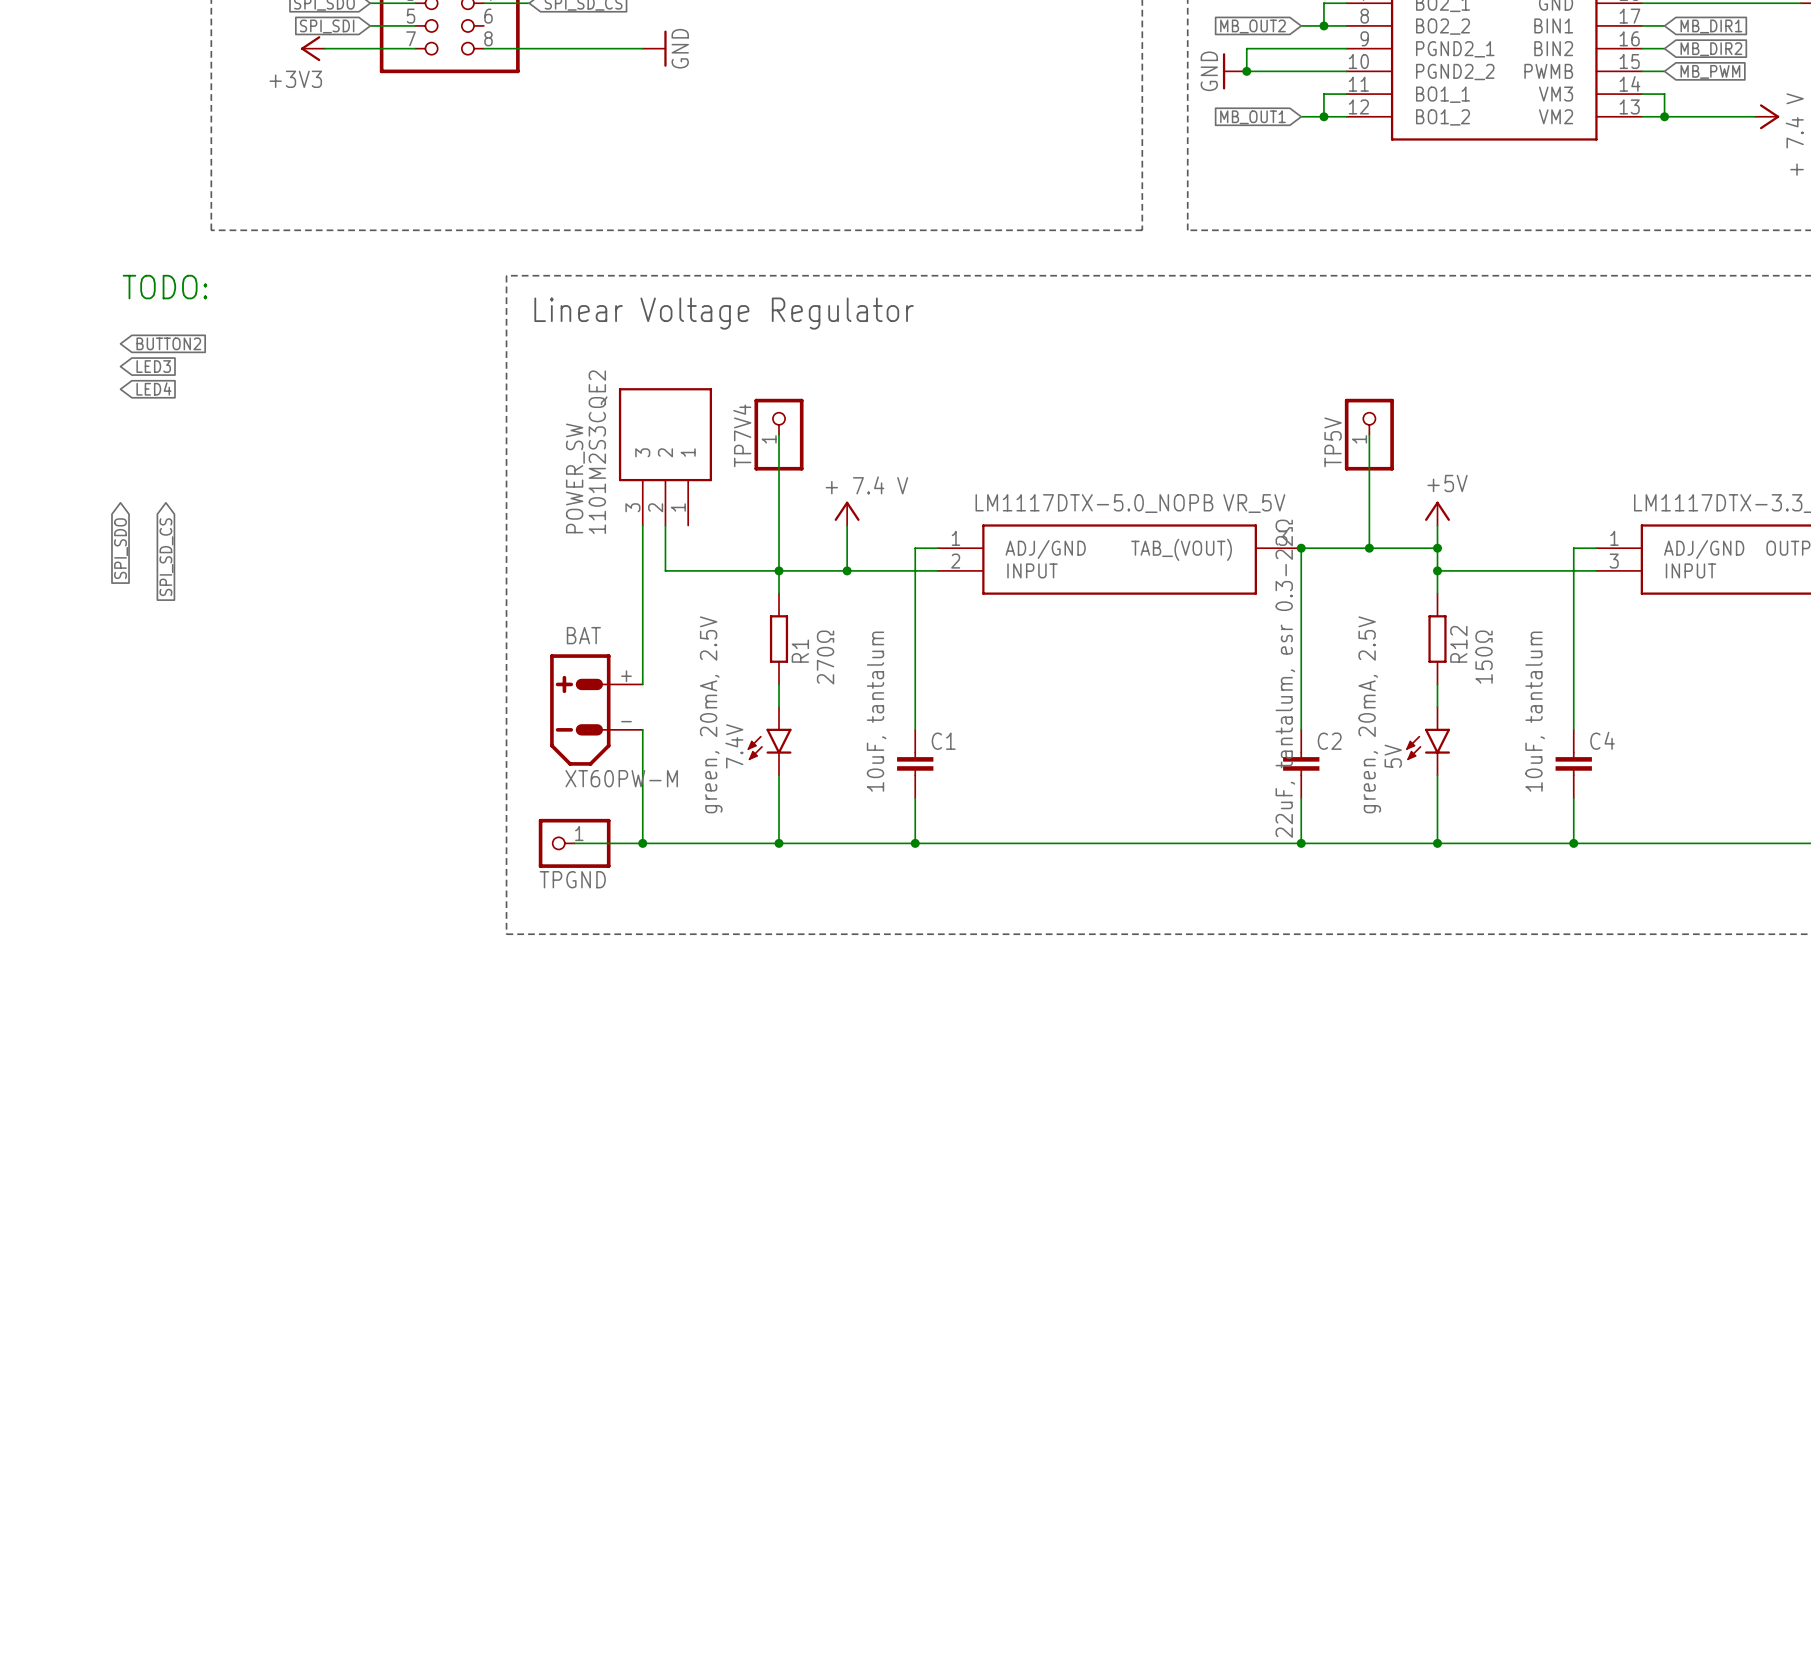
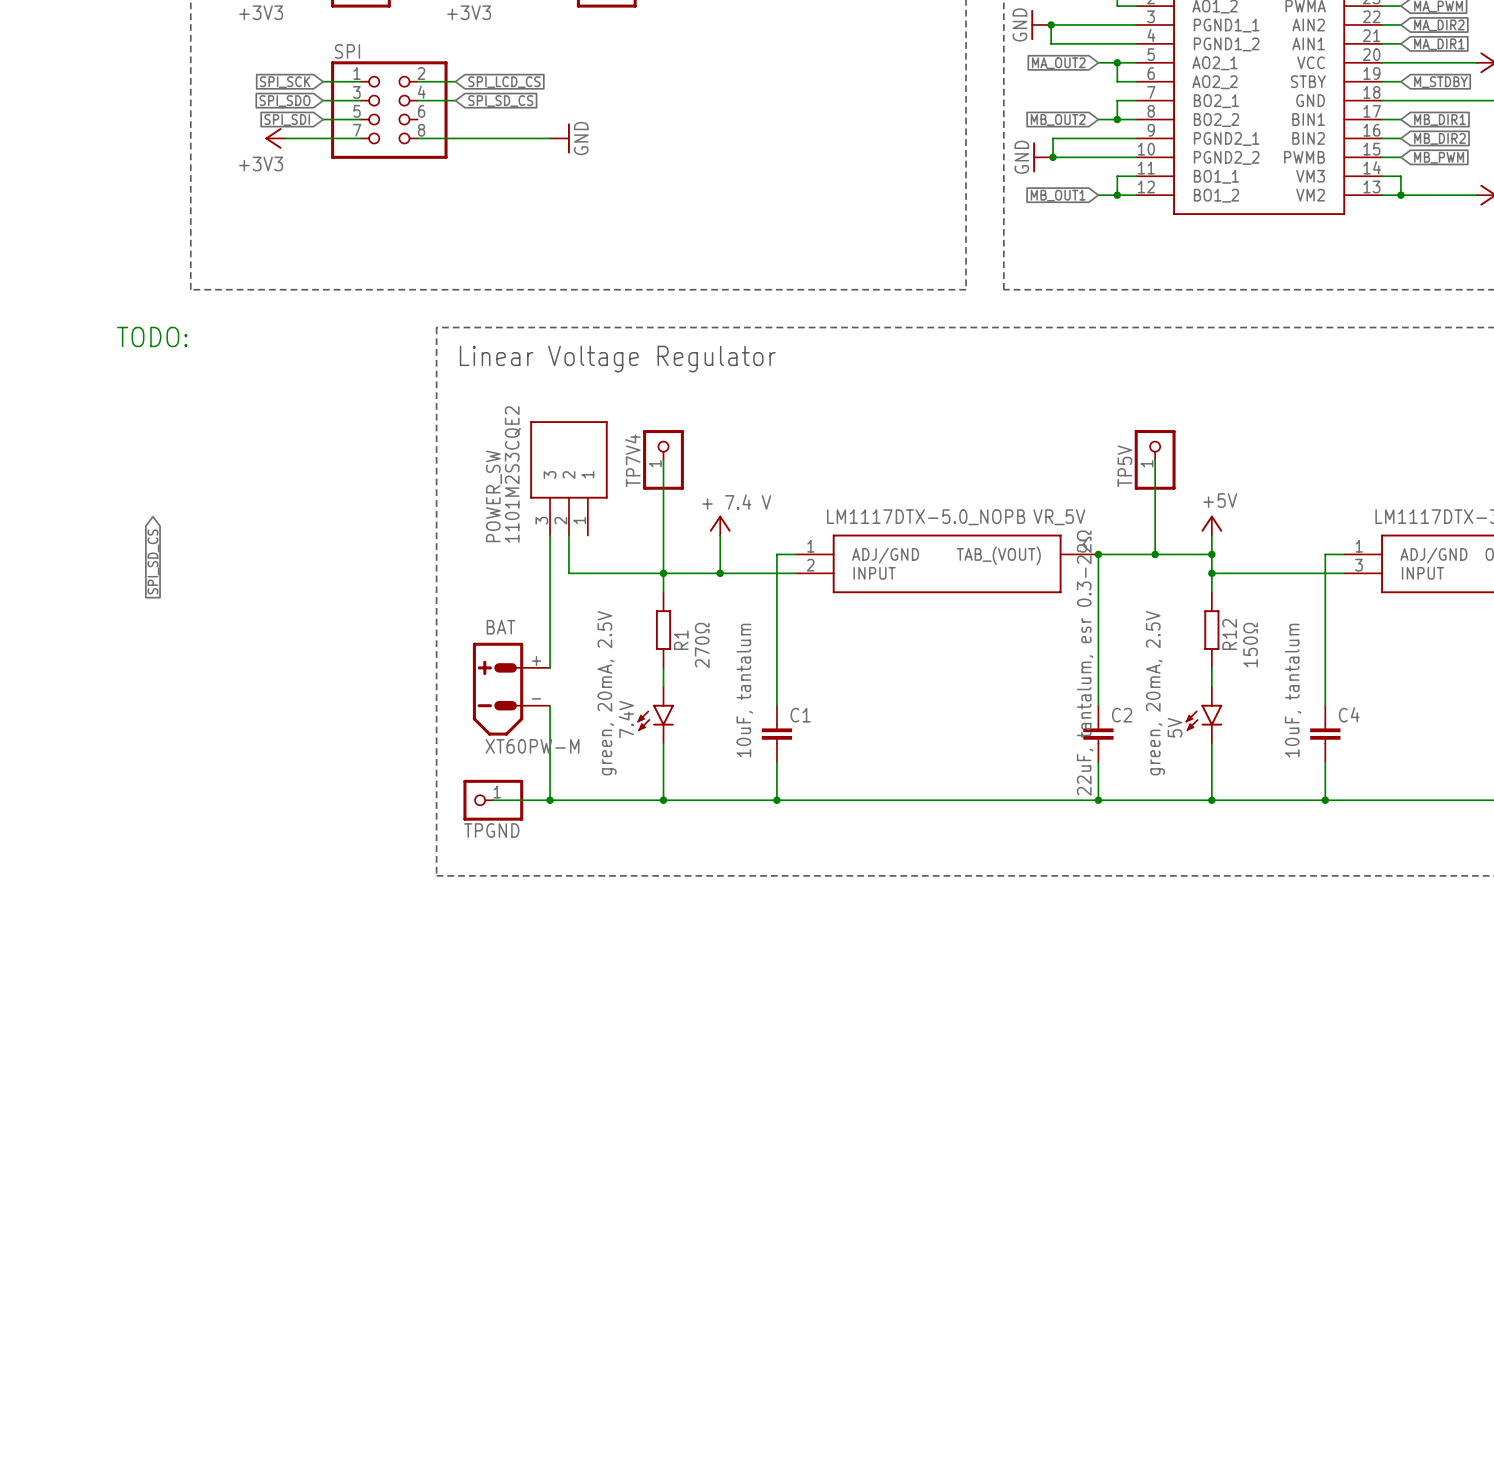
global label: BUTTON2 (168, 343) -> none
global label: LED3 (153, 366) -> none
global label: LED4 (153, 388) -> none
global label: SPI_SDO (121, 548) -> none

